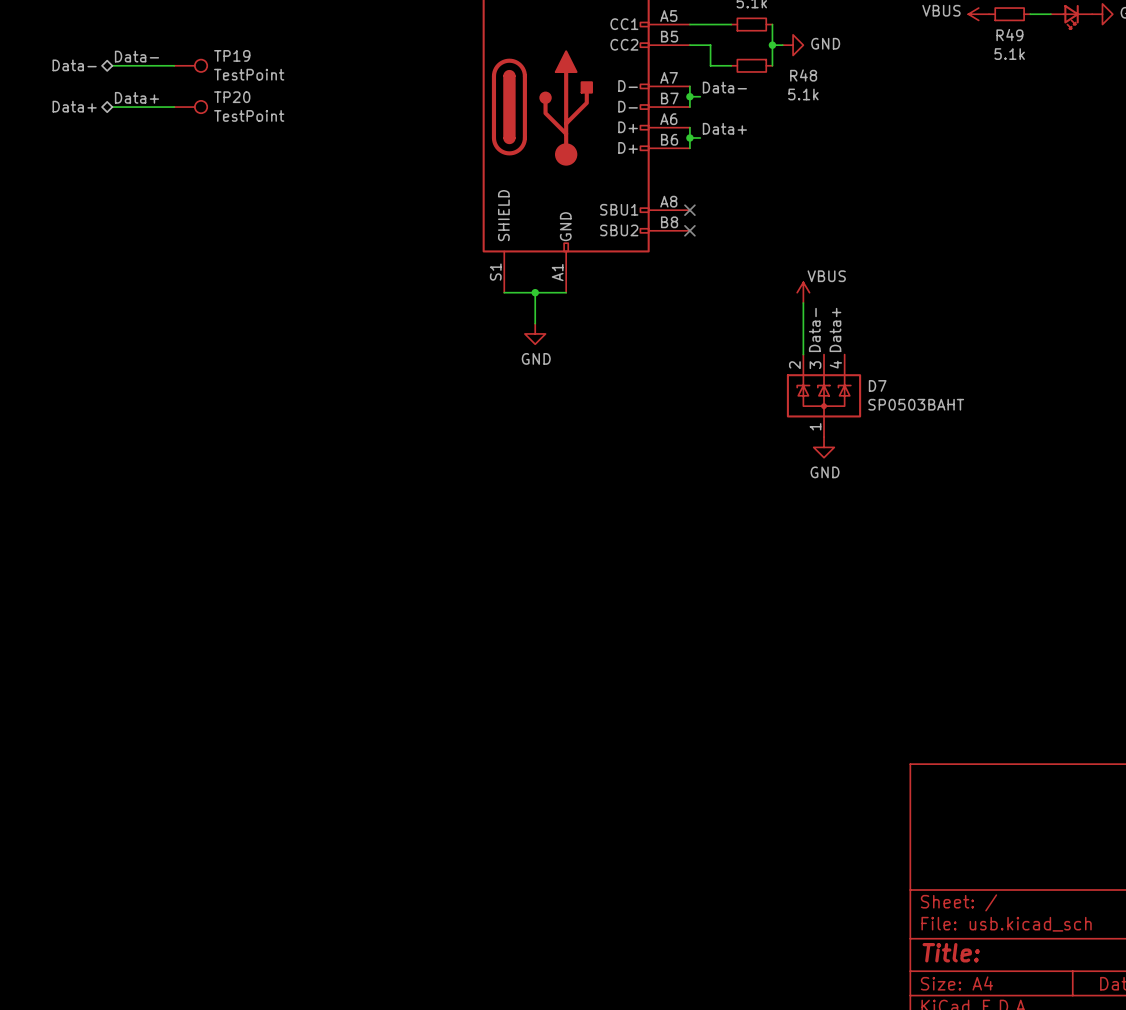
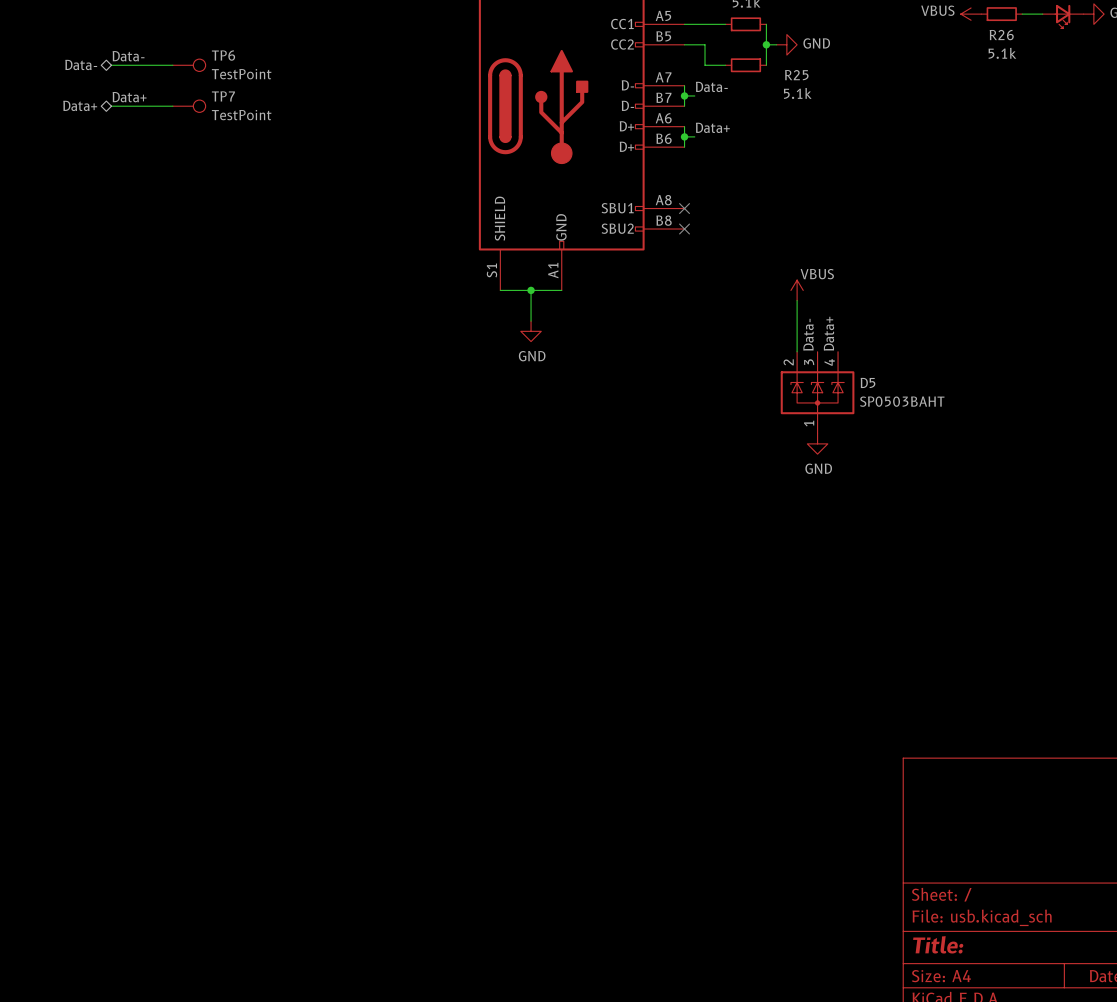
R49 name: R49 (1009, 35) -> R26 (1001, 35)
TP19 name: TP19 (232, 55) -> TP6 (223, 55)
R48 name: R48 (803, 75) -> R25 (796, 75)
TP20 name: TP20 (232, 97) -> TP7 (223, 96)
D7 name: D7 (877, 385) -> D5 (868, 382)

